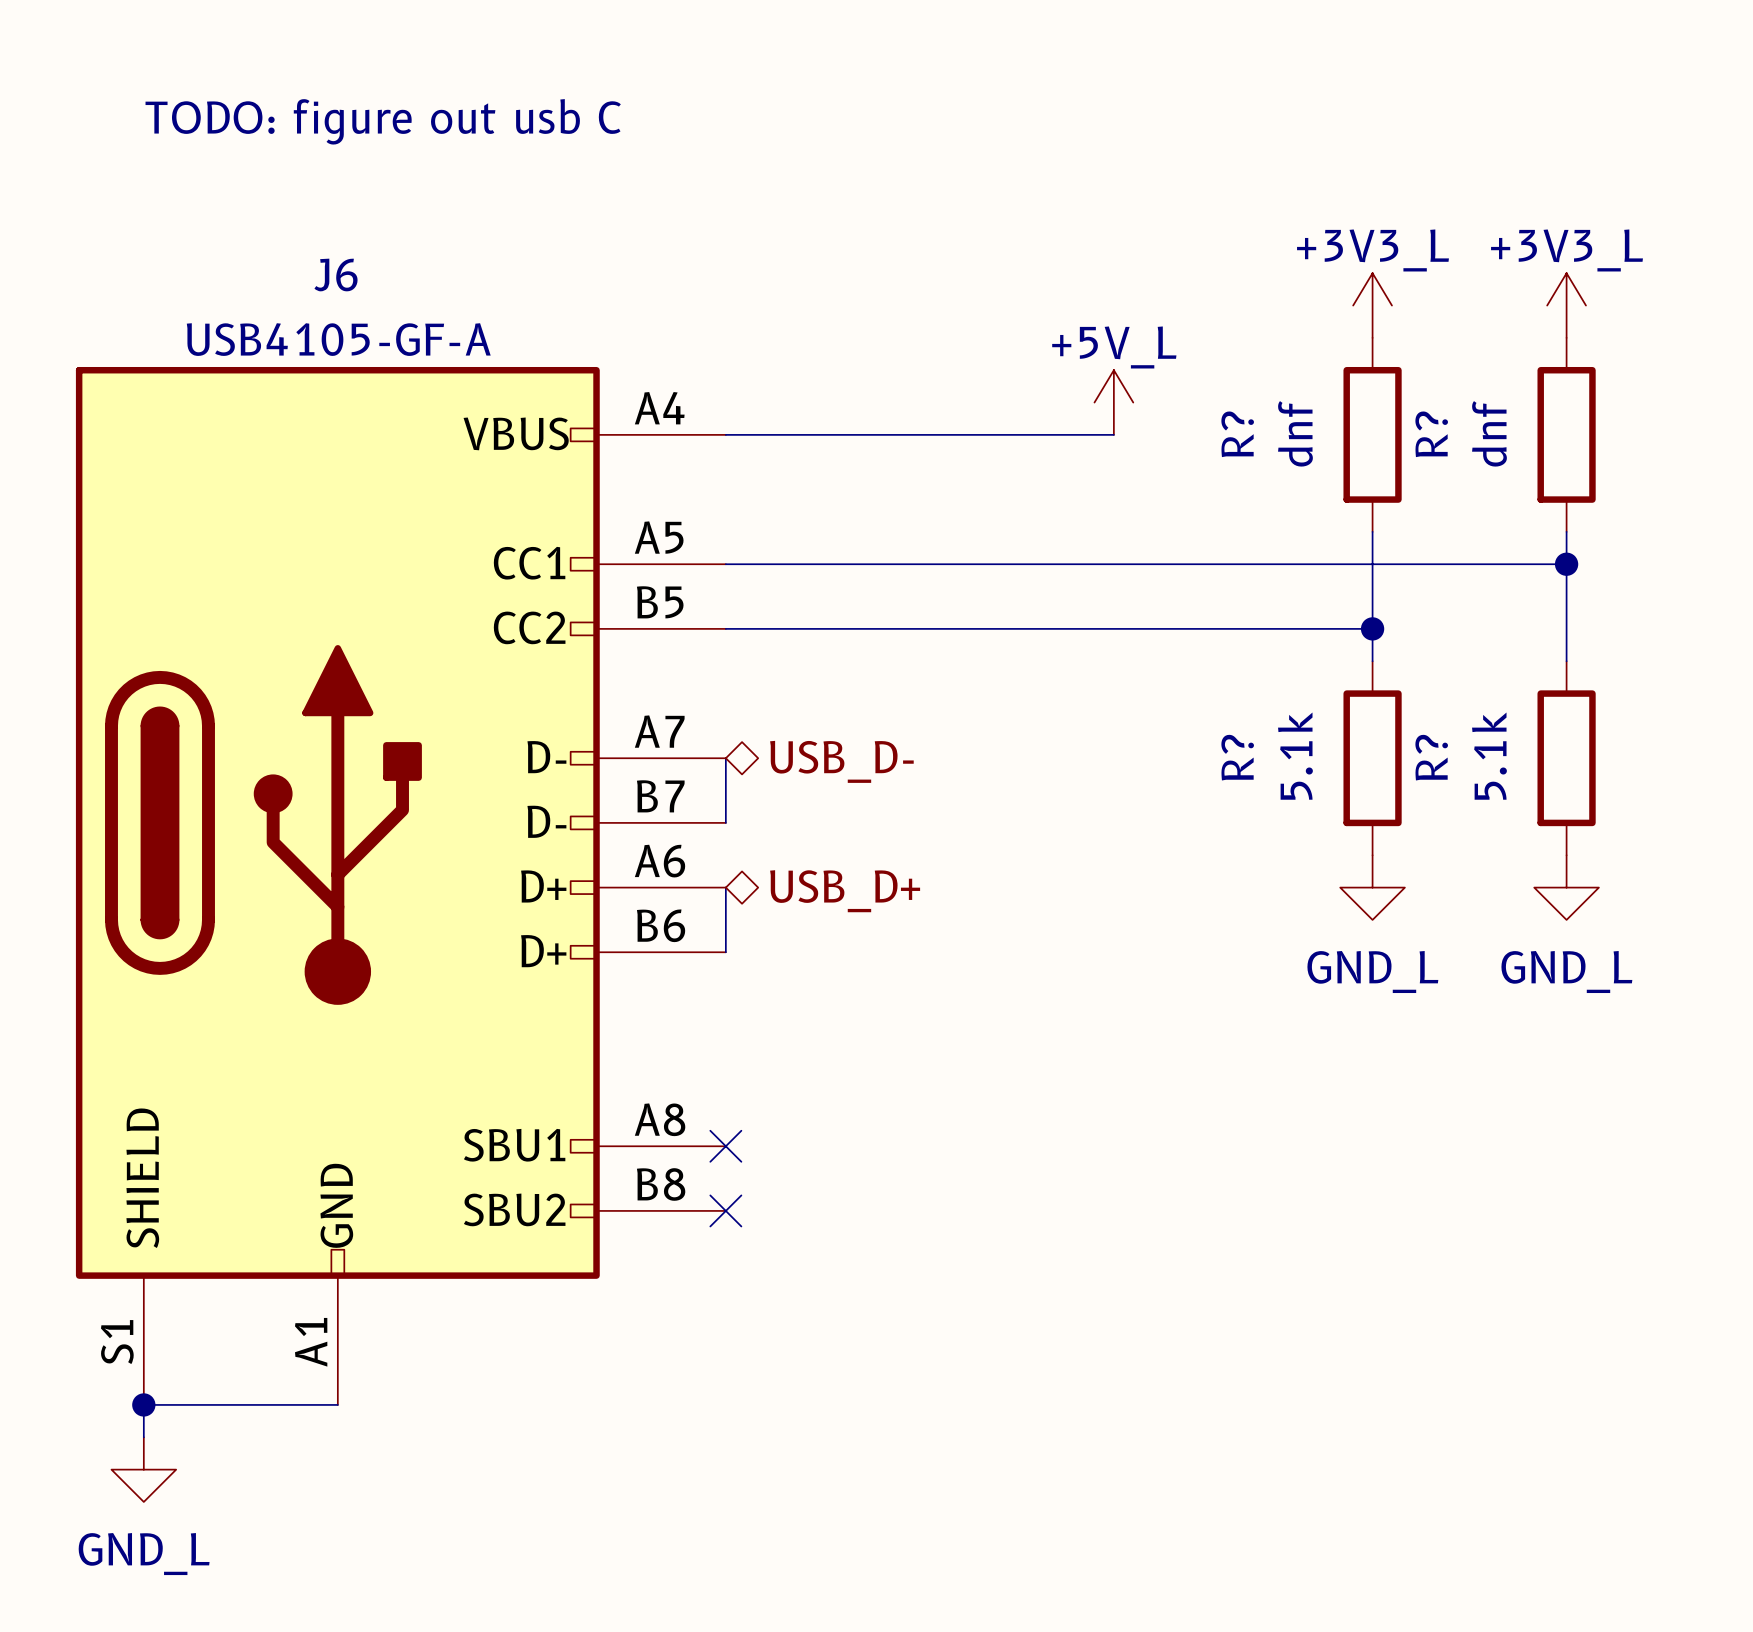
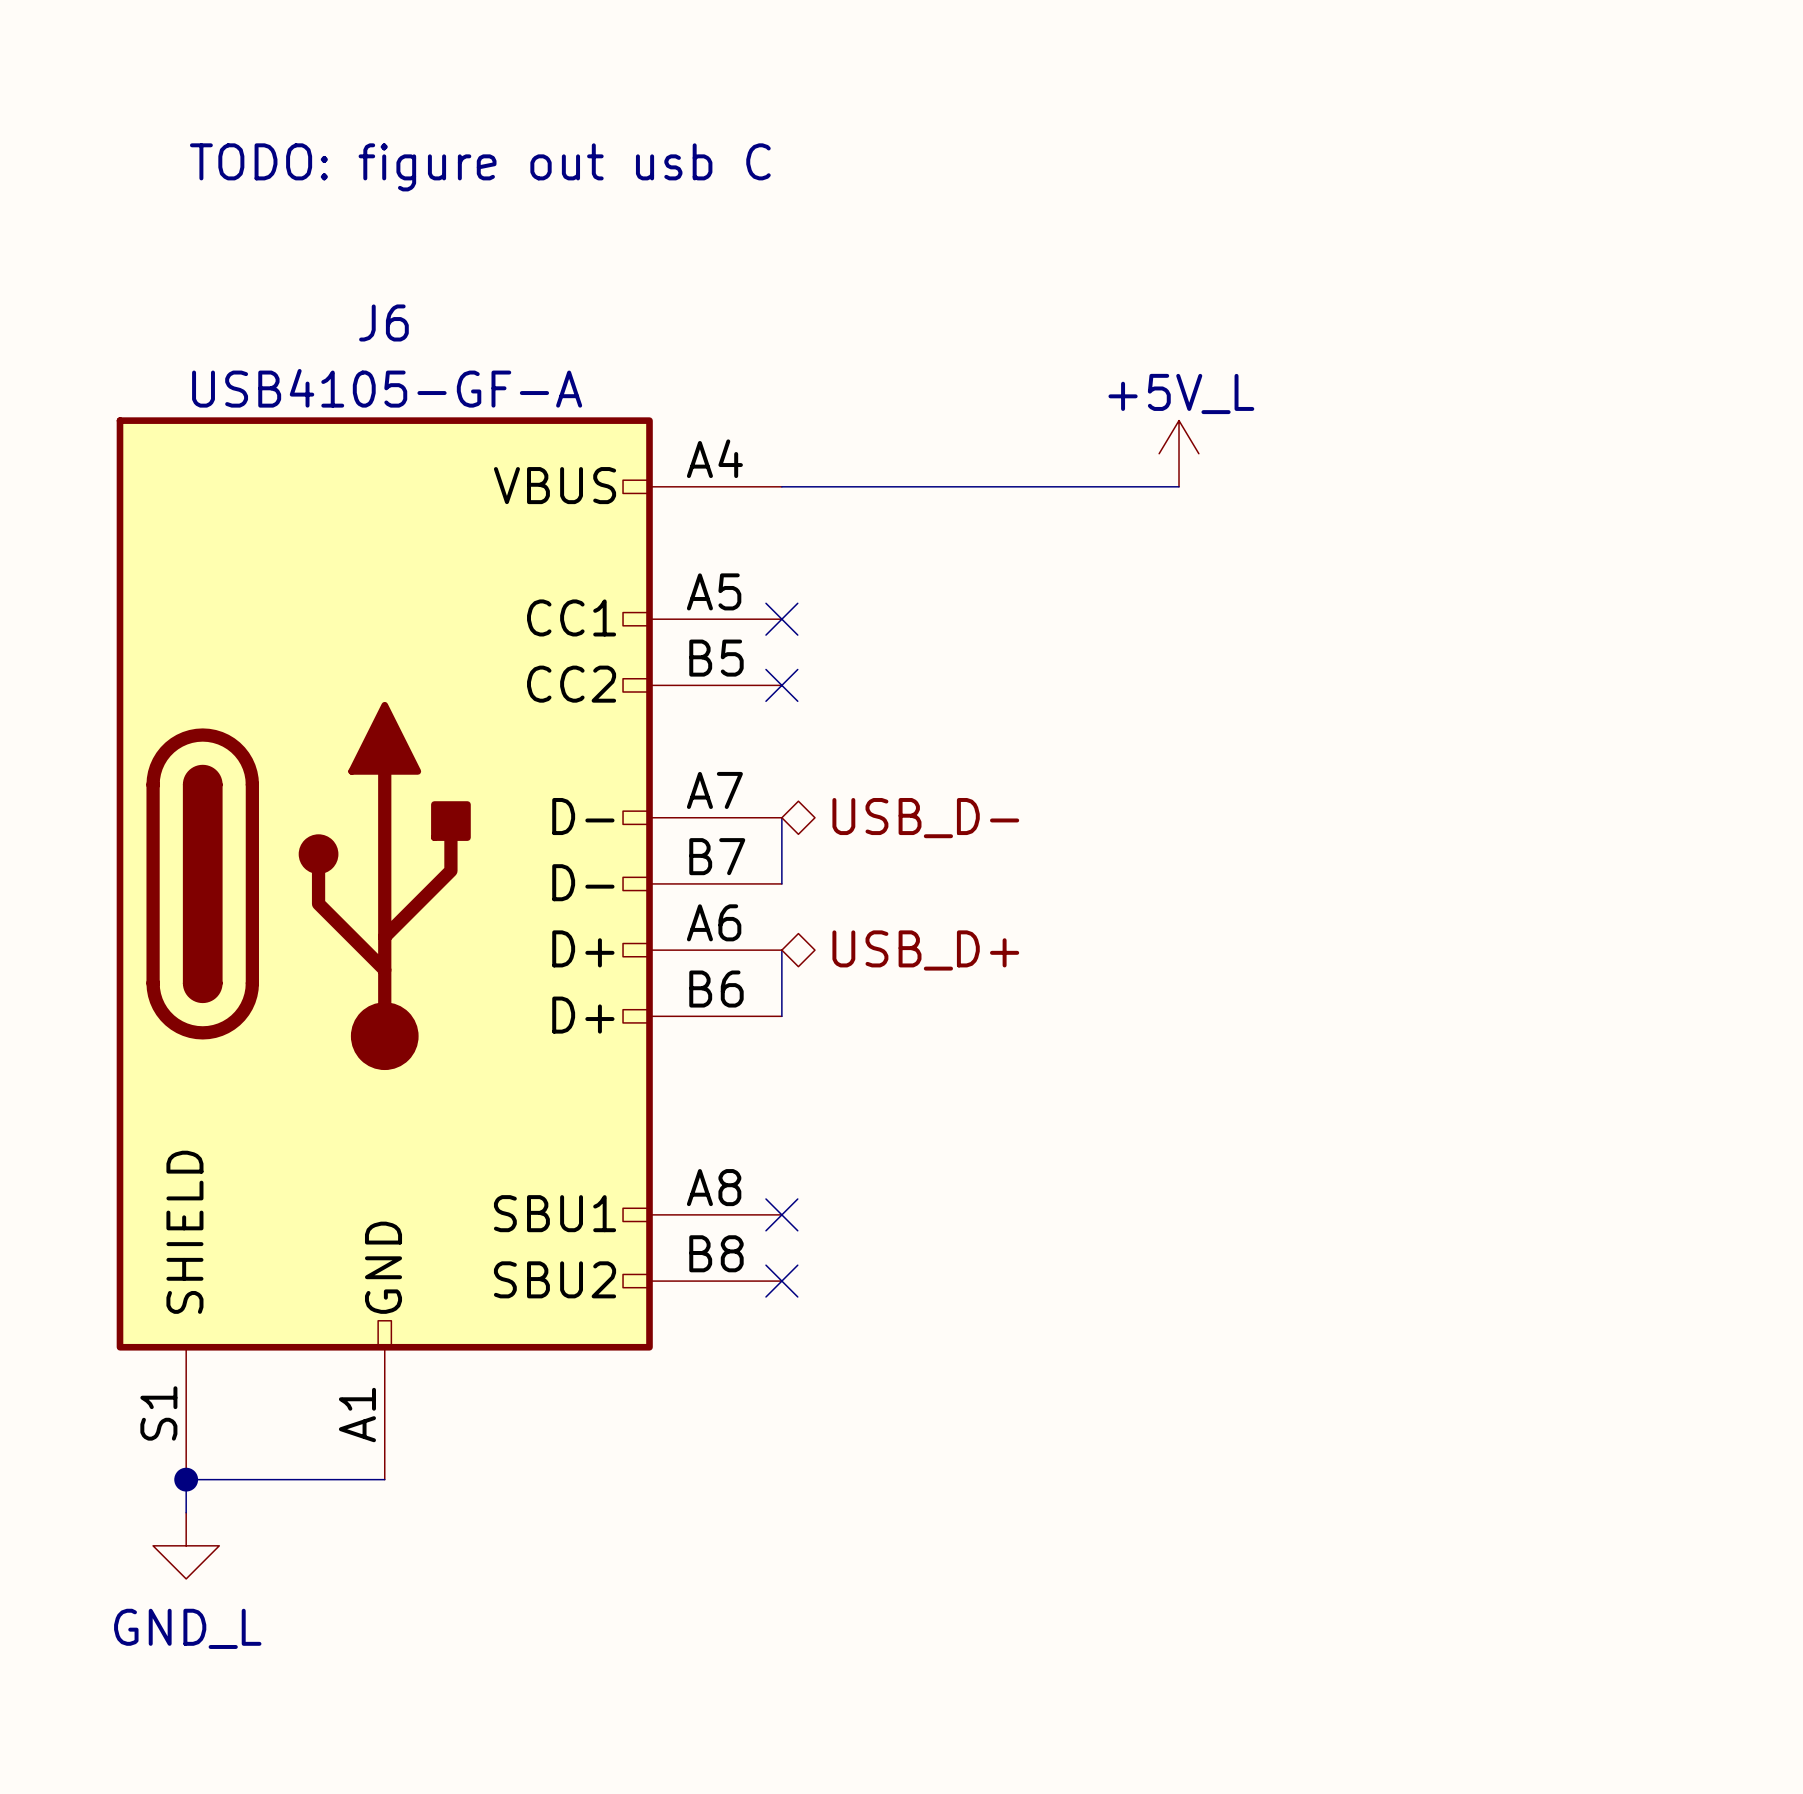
power symbol: +3V3_L (1372, 305) -> none
power symbol: +3V3_L (1566, 305) -> none
R?: dnf (1372, 434) -> none
R?: dnf (1566, 434) -> none
wire: (1372, 531) (1372, 661) -> none
wire: (1566, 531) (1566, 661) -> none
wire: (725, 564) (1566, 564) -> none
no-connect mark: none -> (781, 619)
junction: (1566, 564) -> none
wire: (725, 628) (1372, 628) -> none
no-connect mark: none -> (781, 685)
junction: (1372, 628) -> none
R?: 5.1k (1372, 758) -> none
R?: 5.1k (1566, 758) -> none
power symbol: GND_L (1372, 887) -> none
power symbol: GND_L (1566, 887) -> none

